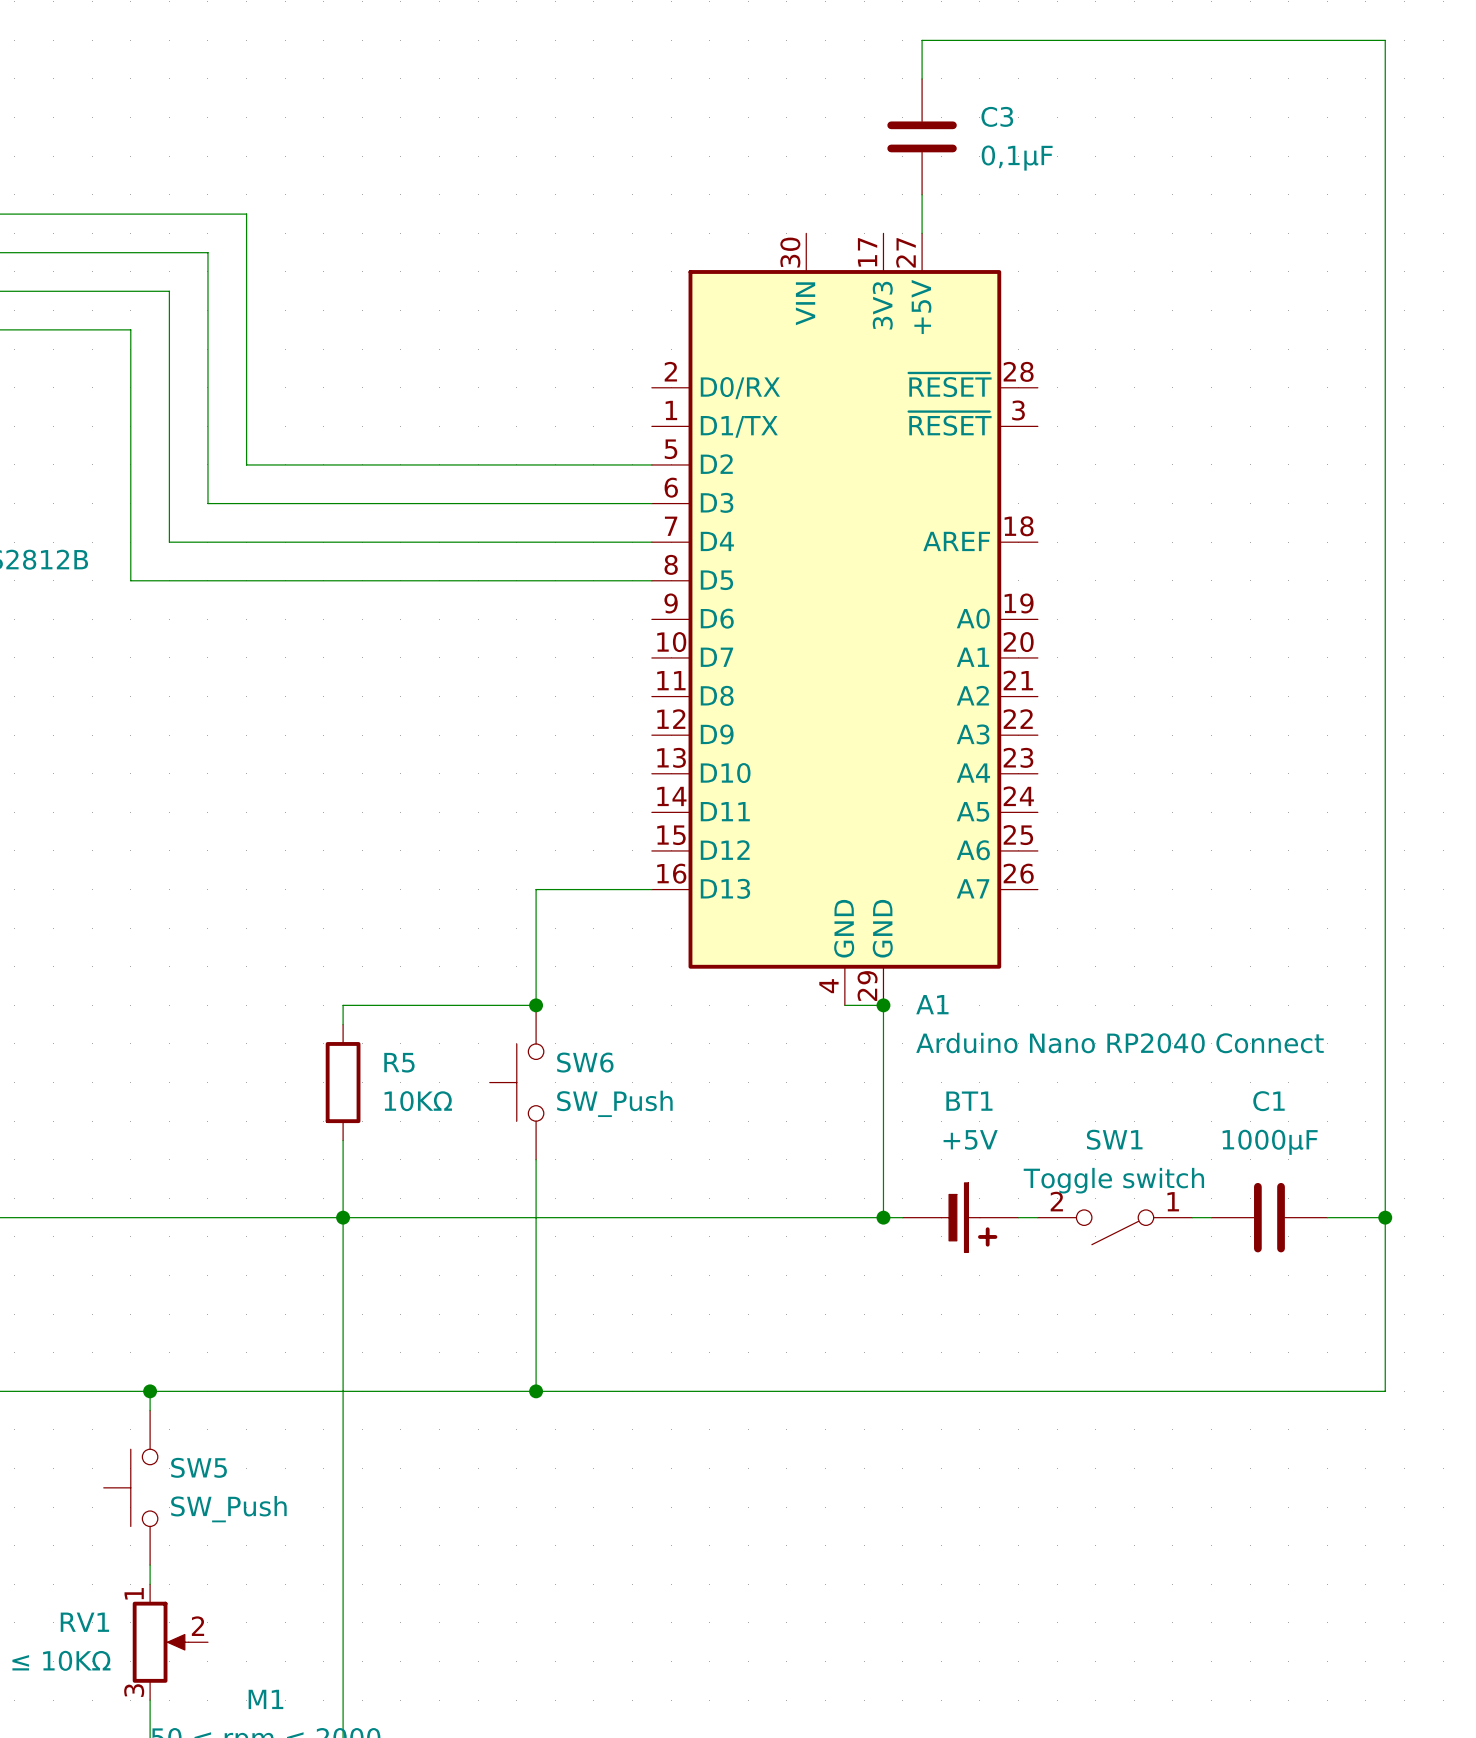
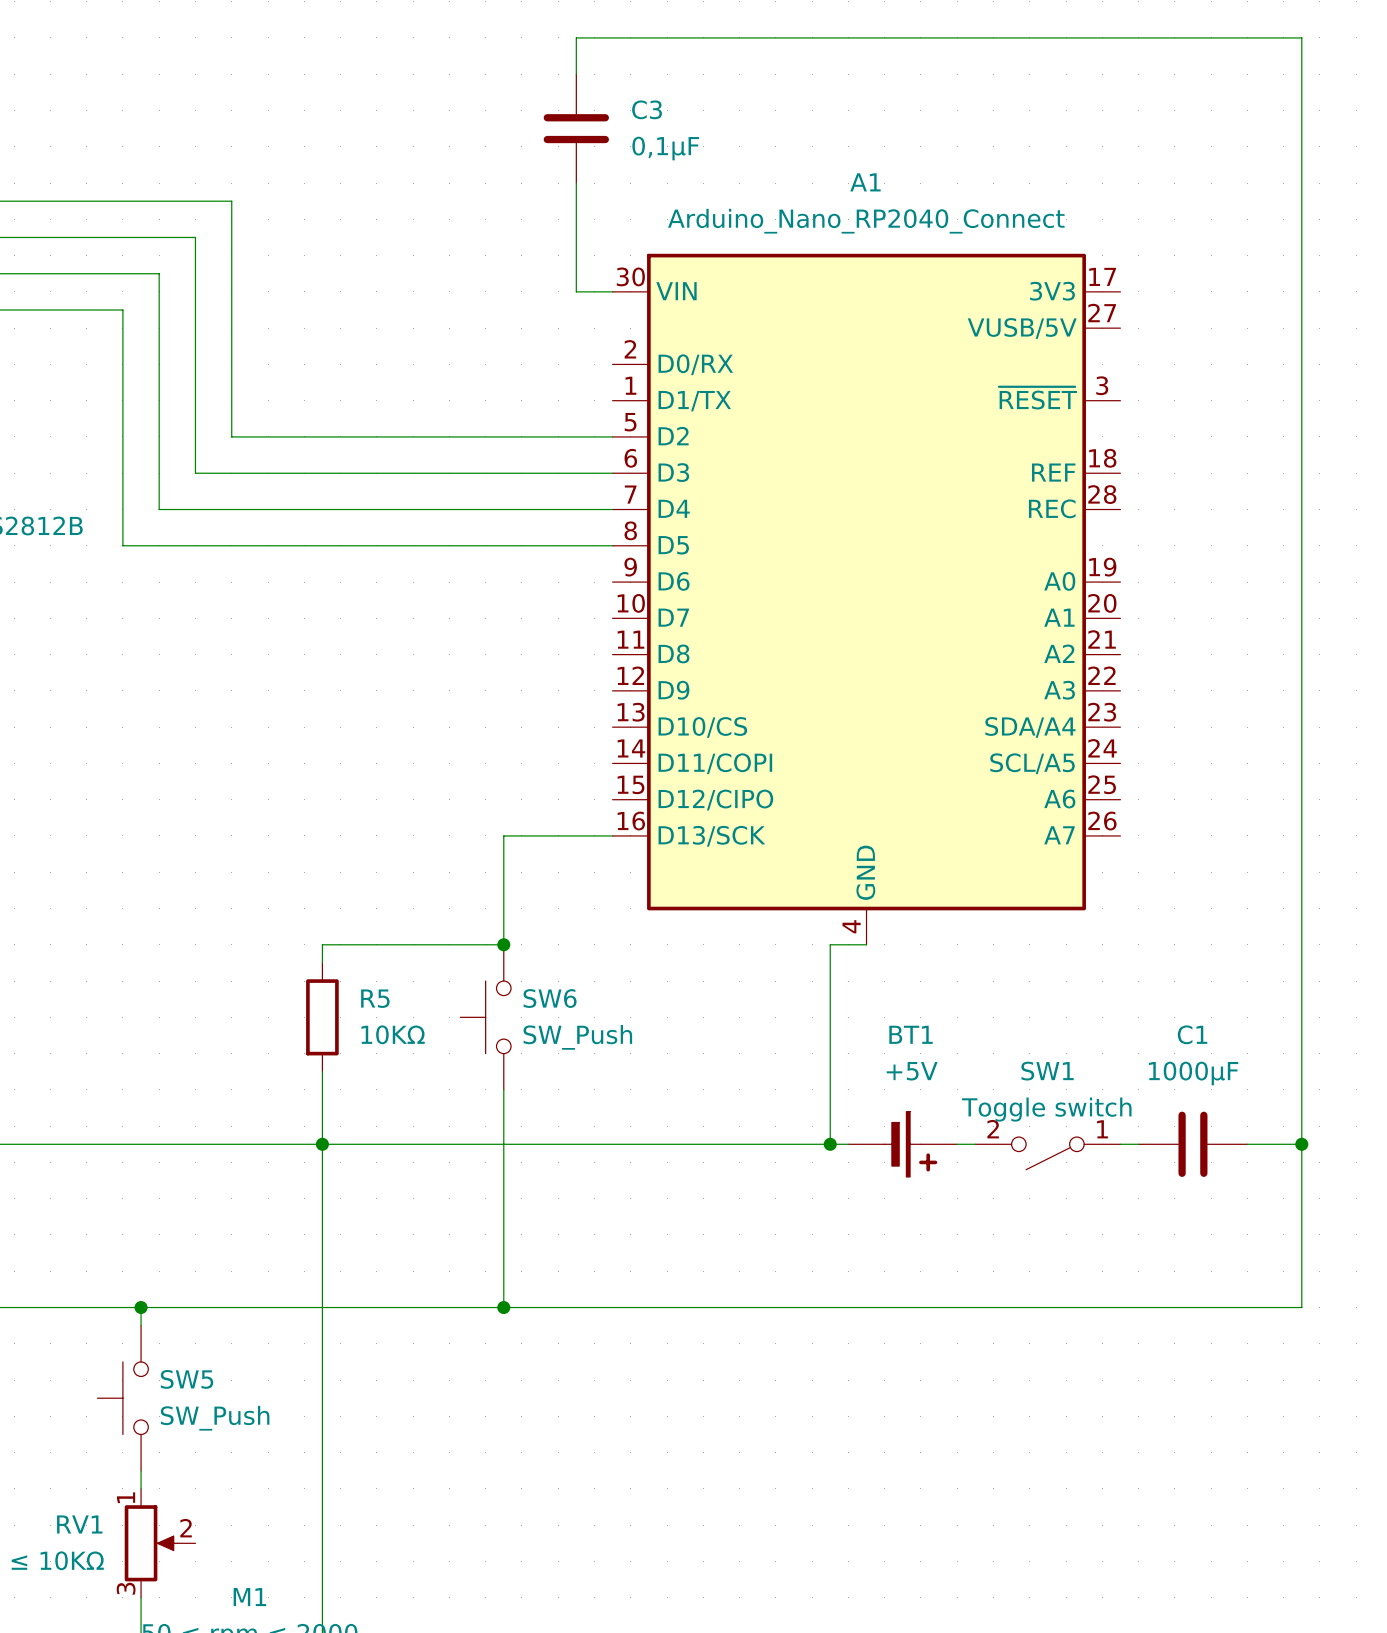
wire: (922, 40) (922, 78) -> (866, 37) (576, 37) (576, 74)
C3 position: (922, 136) -> (576, 128)
wire: none -> (576, 183) (576, 291) (612, 291)
wire: (922, 194) (922, 233) -> none
A1 symbol: [651, 233, 1038, 1006] -> [612, 253, 1121, 945]
A1 name position: A1 (932, 1004) -> A1 (865, 182)
wire: (844, 1005) (883, 1005) -> (866, 944) (830, 944)
junction: (883, 1005) -> none
A1 value: Arduino Nano RP2040 Connect (1119, 1043) -> Arduino_Nano_RP2040_Connect (866, 221)

